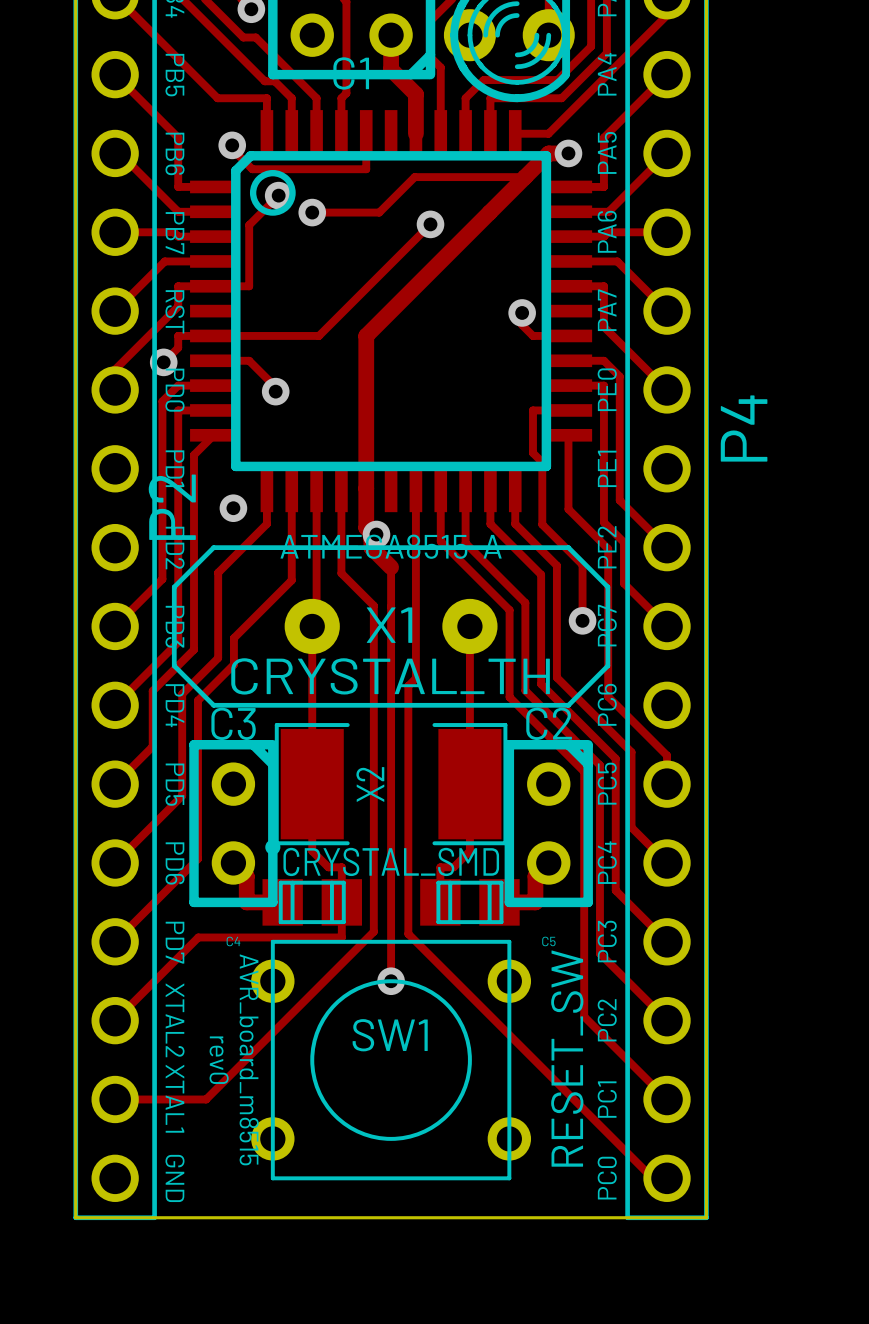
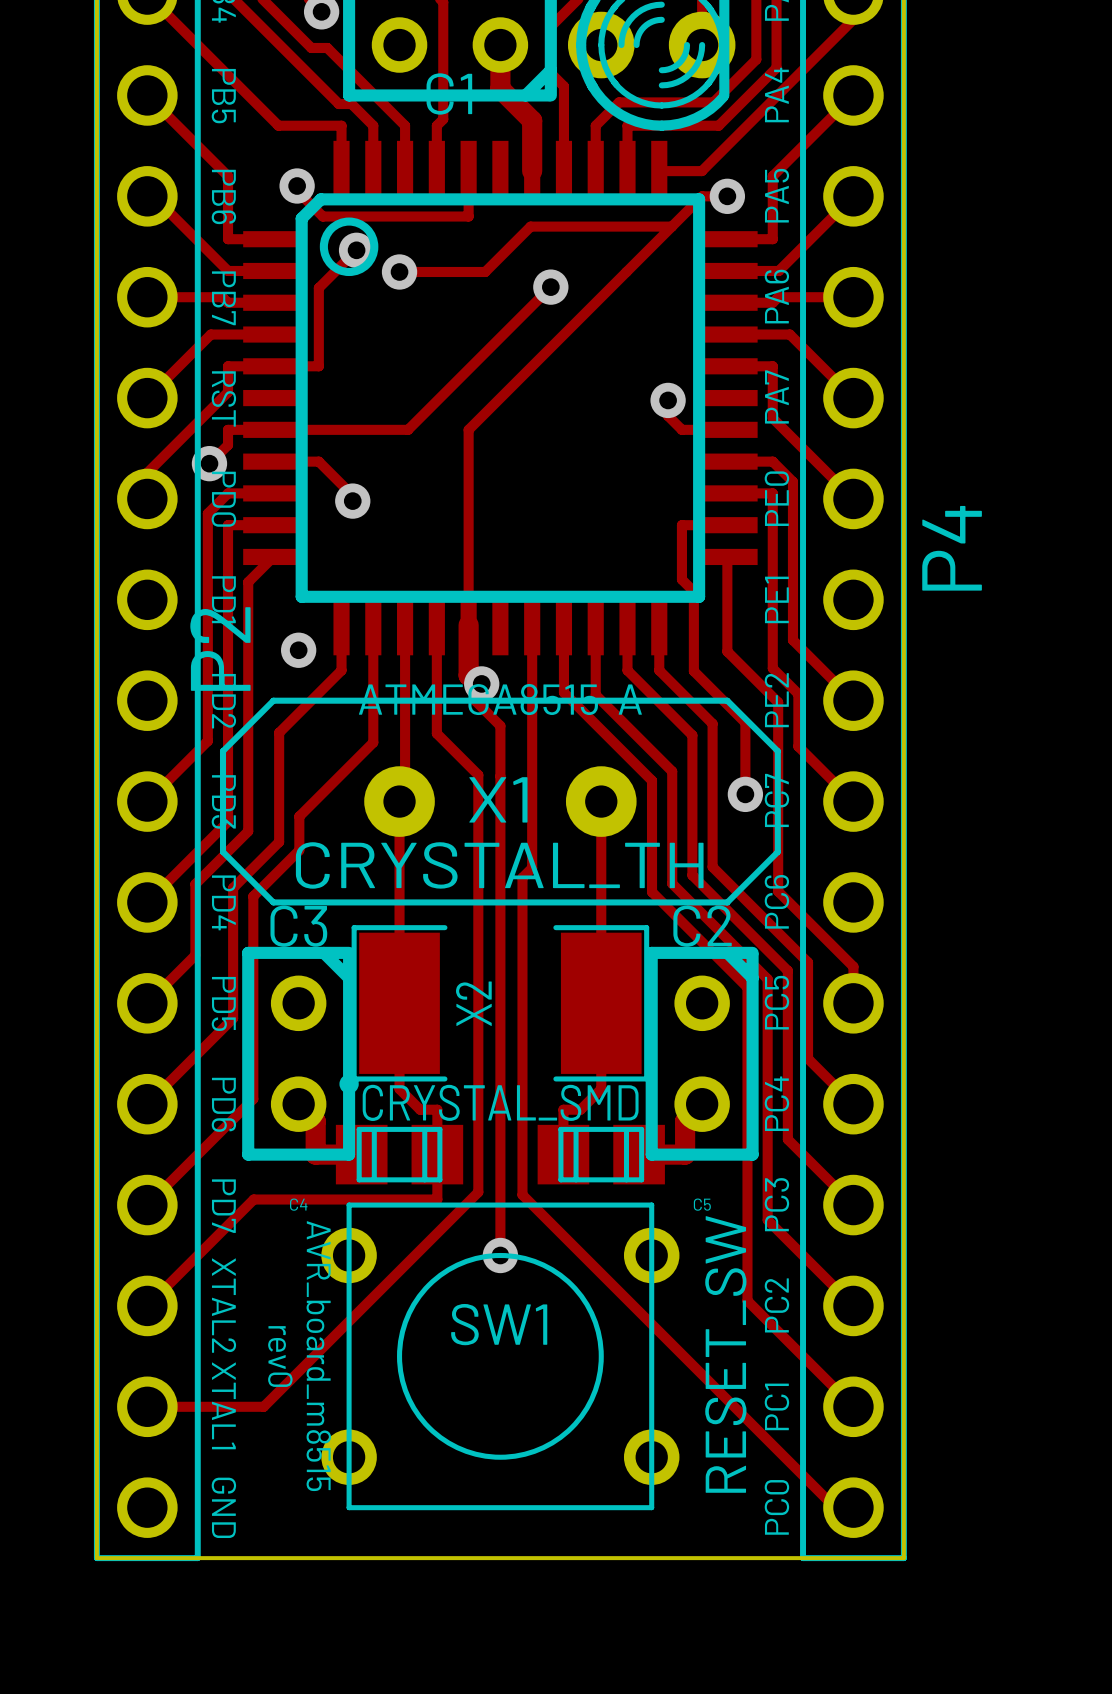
track width: thick (568, 153) (548, 153) (366, 335) (366, 488) -> thin (727, 196) (702, 196) (468, 429) (468, 625)
track width: thick (376, 534) (371, 539) (371, 547) (391, 567) -> thin (481, 683) (475, 690) (475, 700) (500, 725)

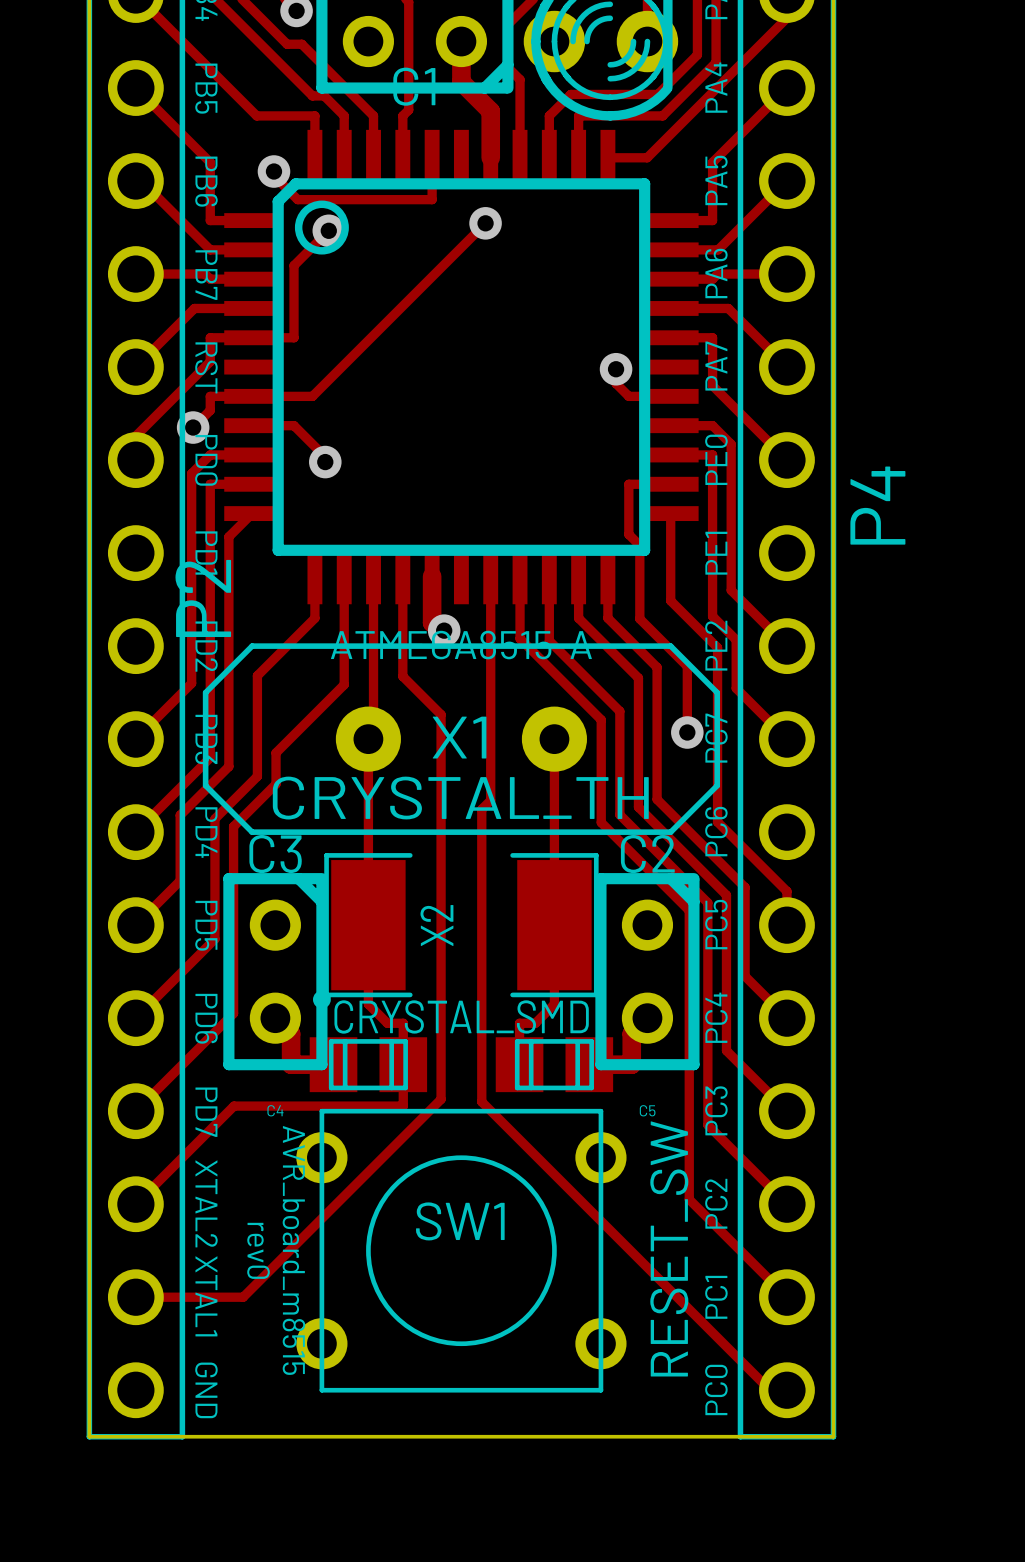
track: (727, 196) (702, 196) (468, 429) (468, 625) -> none
via: (727, 196) -> none
track: (671, 226) (530, 226) (485, 271) (399, 271) -> none
via: (399, 271) -> none
track: (551, 286) (408, 429) (338, 429) -> (485, 223) (312, 396)
via position: (550, 287) -> (485, 223)
via: (298, 650) -> none
track: (481, 683) (475, 690) (475, 700) (500, 725) (500, 1255) -> none
via: (500, 1255) -> none

